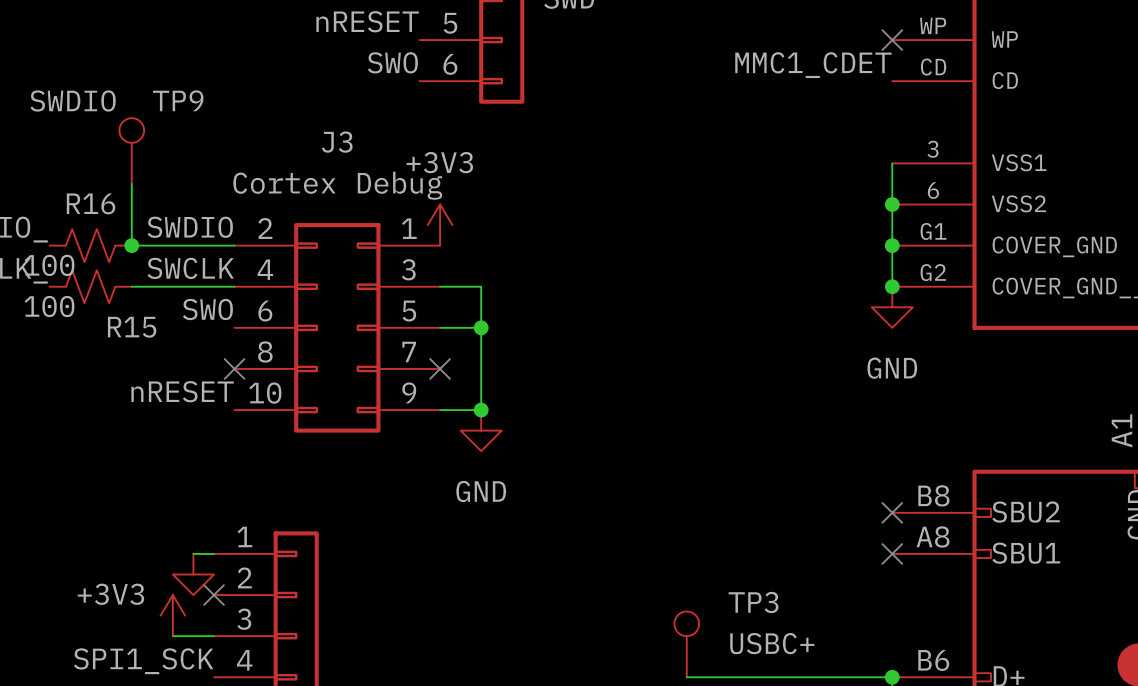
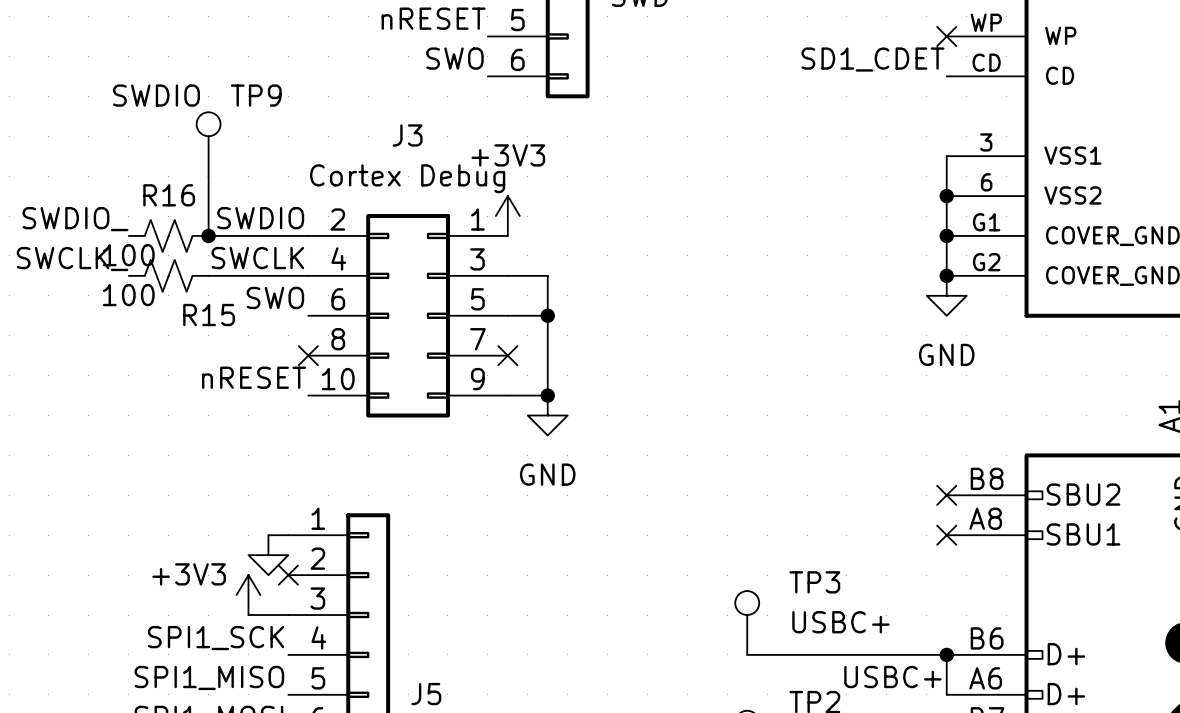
label: MMC1_CDET (813, 65) -> SD1_CDET (872, 59)

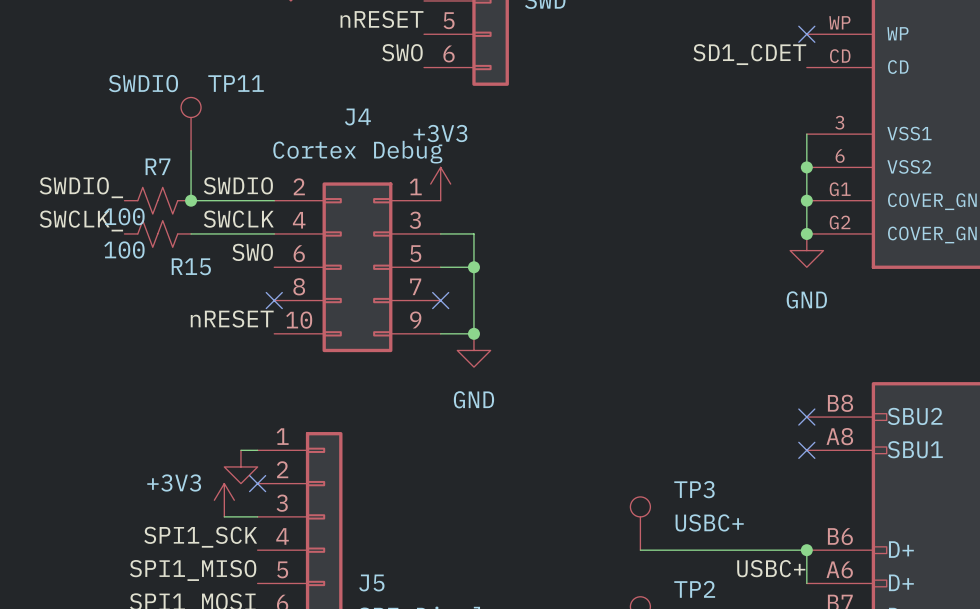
TP9 name: TP9 (256, 95) -> TP11 (236, 83)
J3 name: J3 (407, 135) -> J4 (357, 117)
R16 name: R16 (169, 195) -> R7 (158, 166)

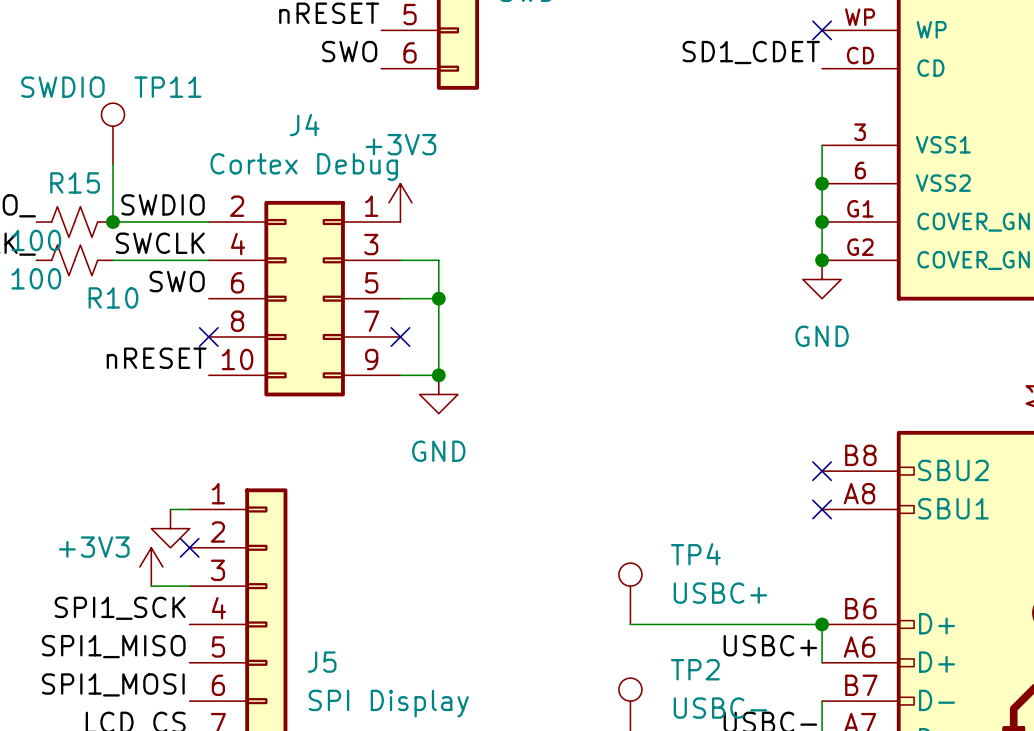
R7 name: R7 (158, 166) -> R15 (75, 182)
R15 name: R15 (191, 266) -> R10 (113, 297)
TP3 name: TP3 (694, 489) -> TP4 (695, 554)

